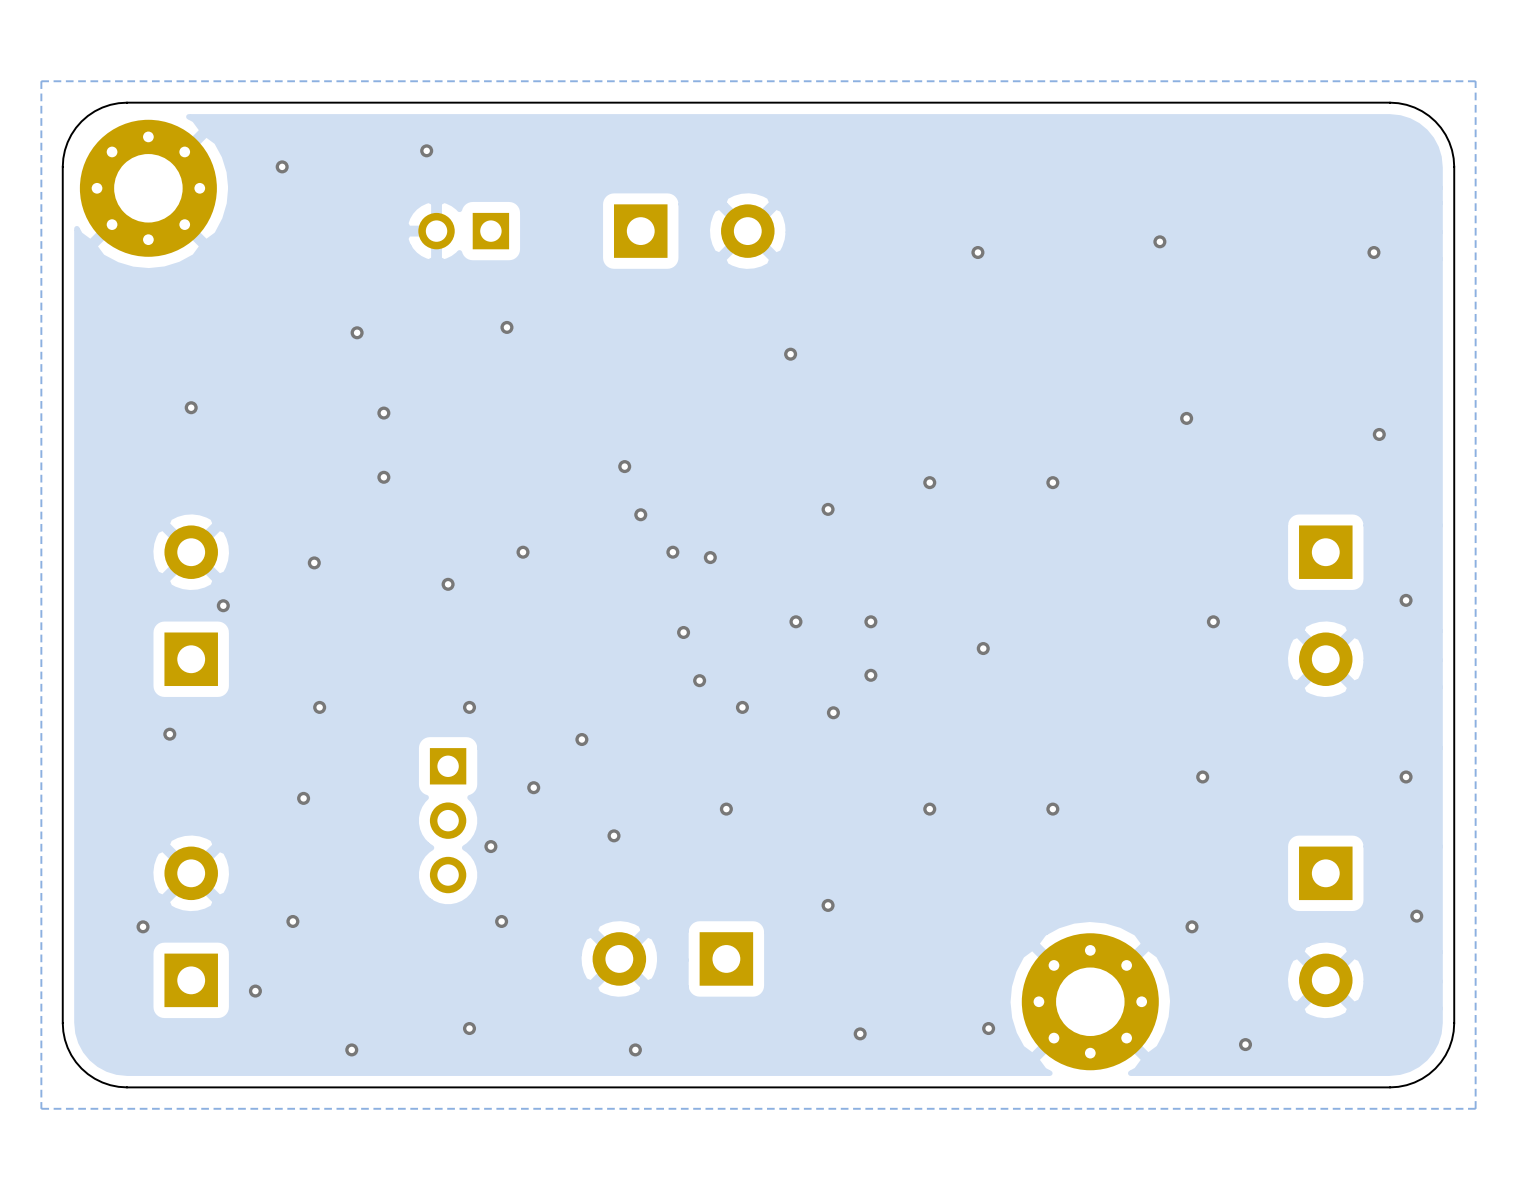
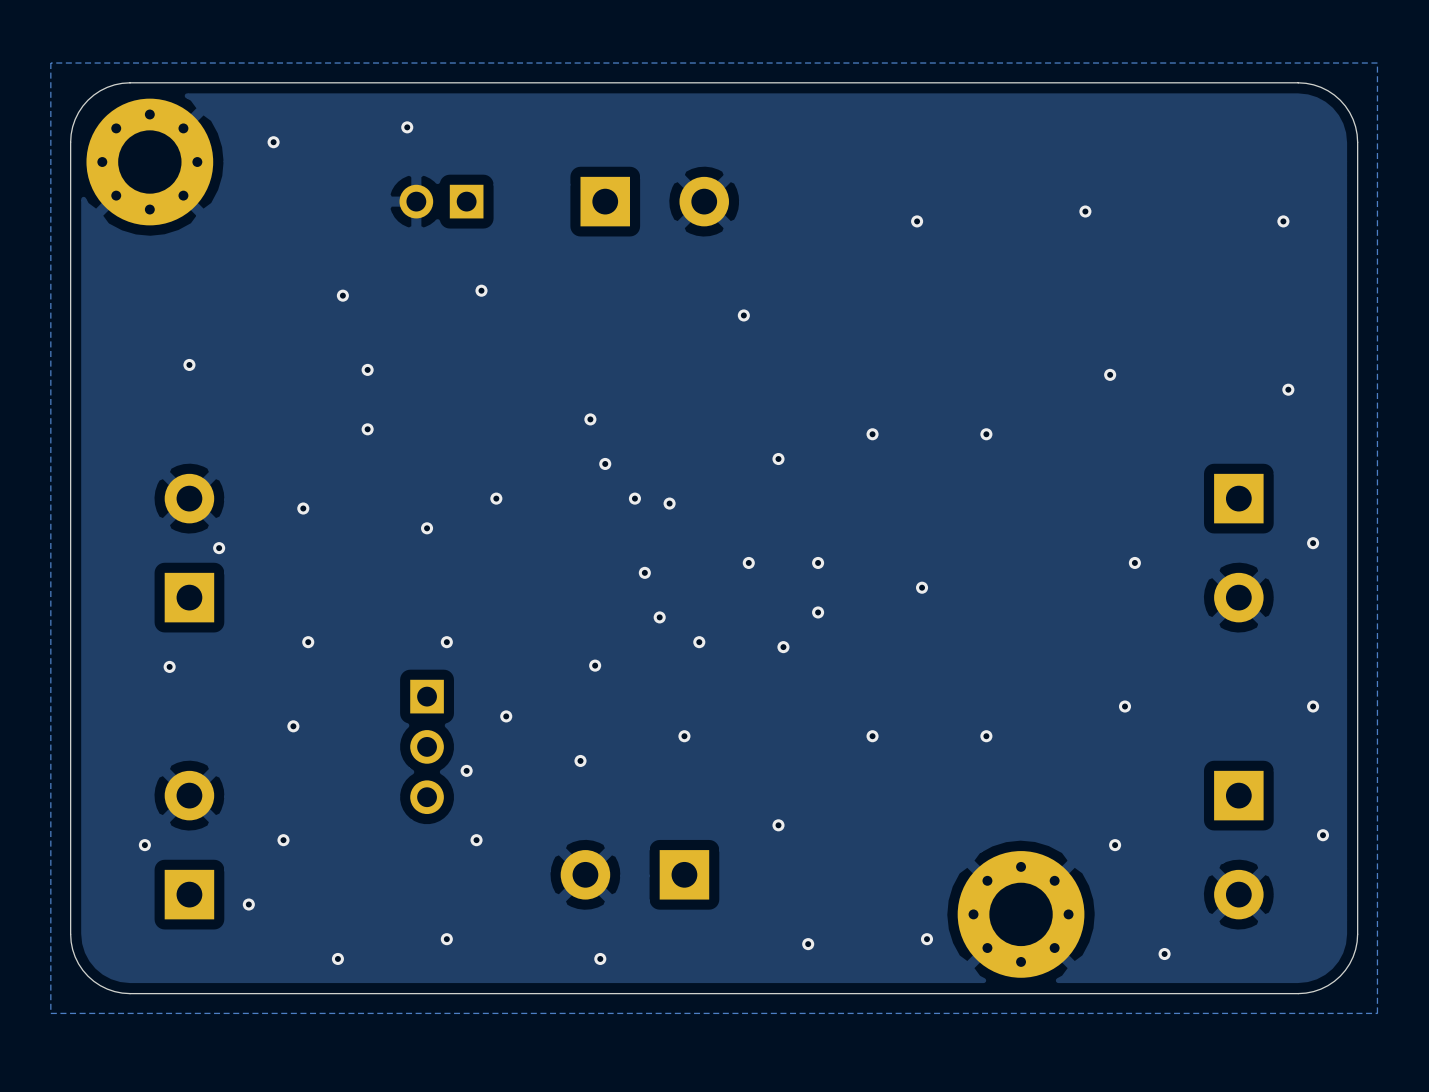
via position: (581, 739) -> (595, 665)

